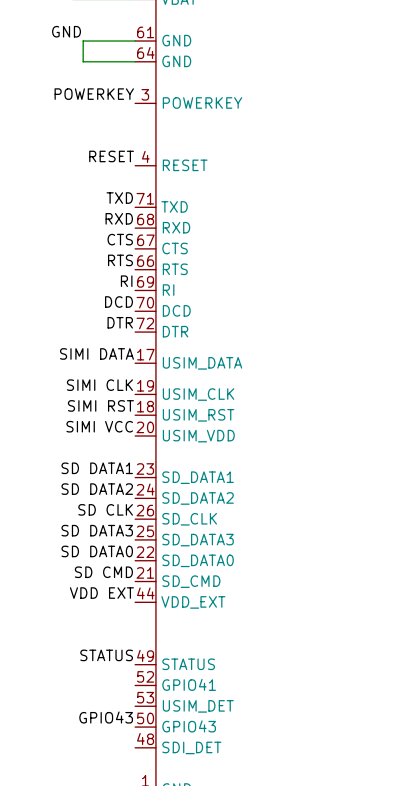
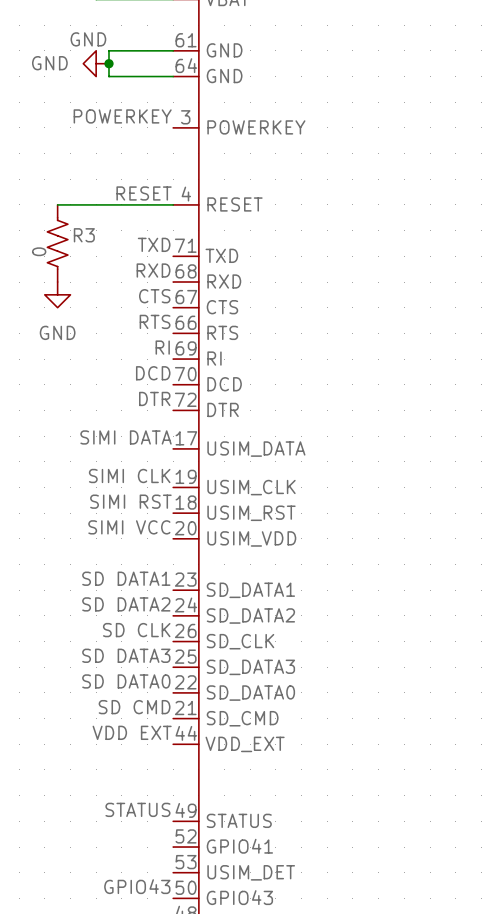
power symbol: none -> GND (96, 63)
junction: none -> (108, 63)
wire: none -> (57, 204) (173, 204)
R3: none -> 0 (57, 243)
power symbol: none -> GND (57, 294)

